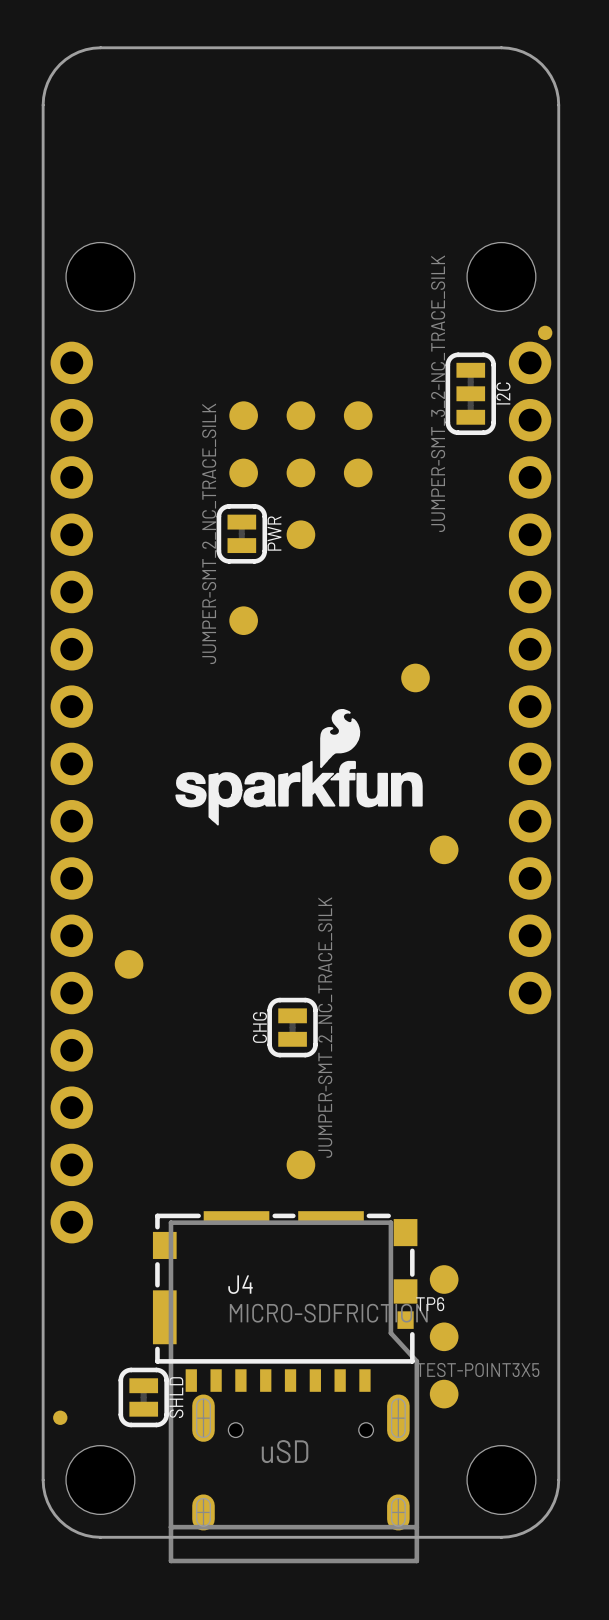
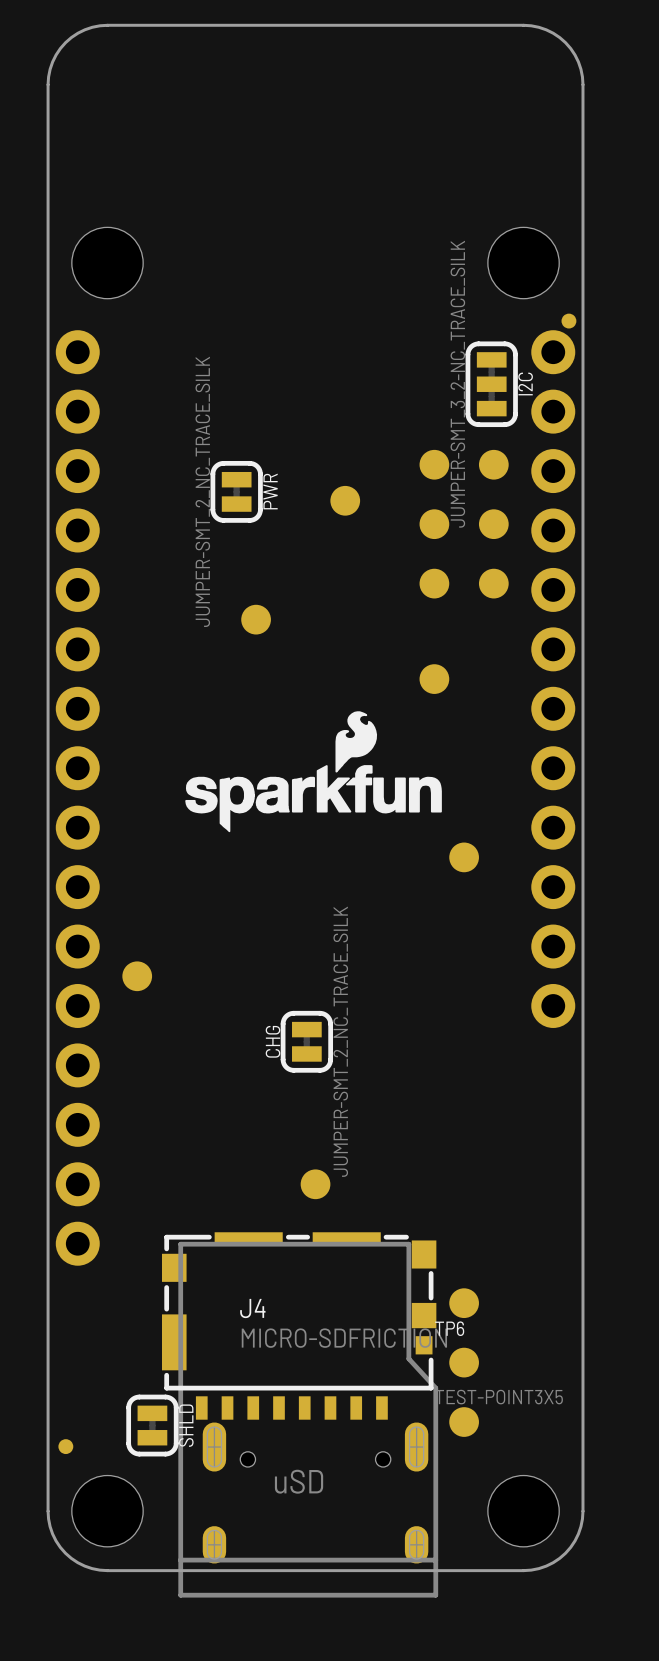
part rotation: 0° (300, 444) -> 90° clockwise (464, 524)
part position: (300, 444) -> (464, 524)
PWR position: (241, 533) -> (236, 491)
part position: (300, 534) -> (345, 500)

